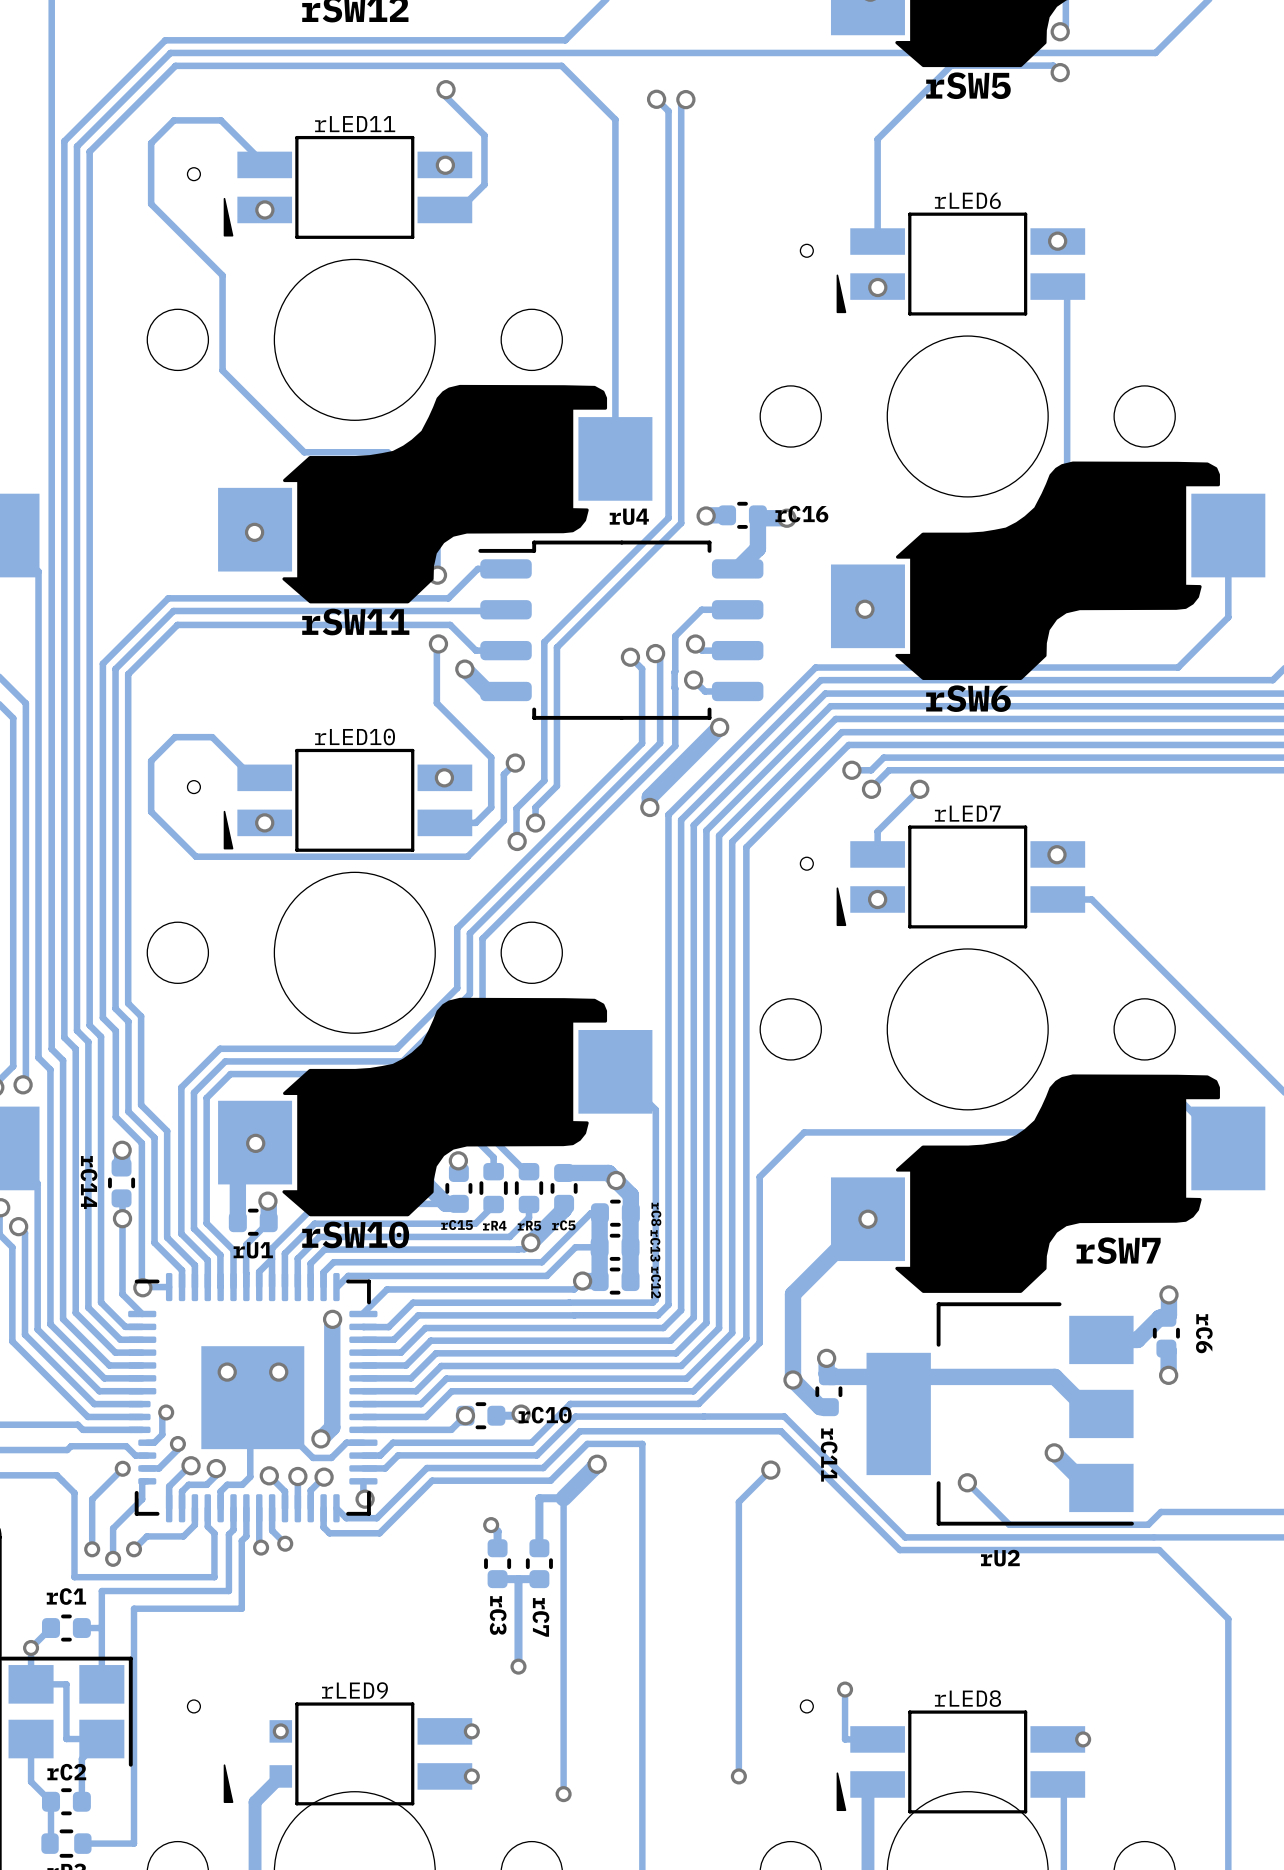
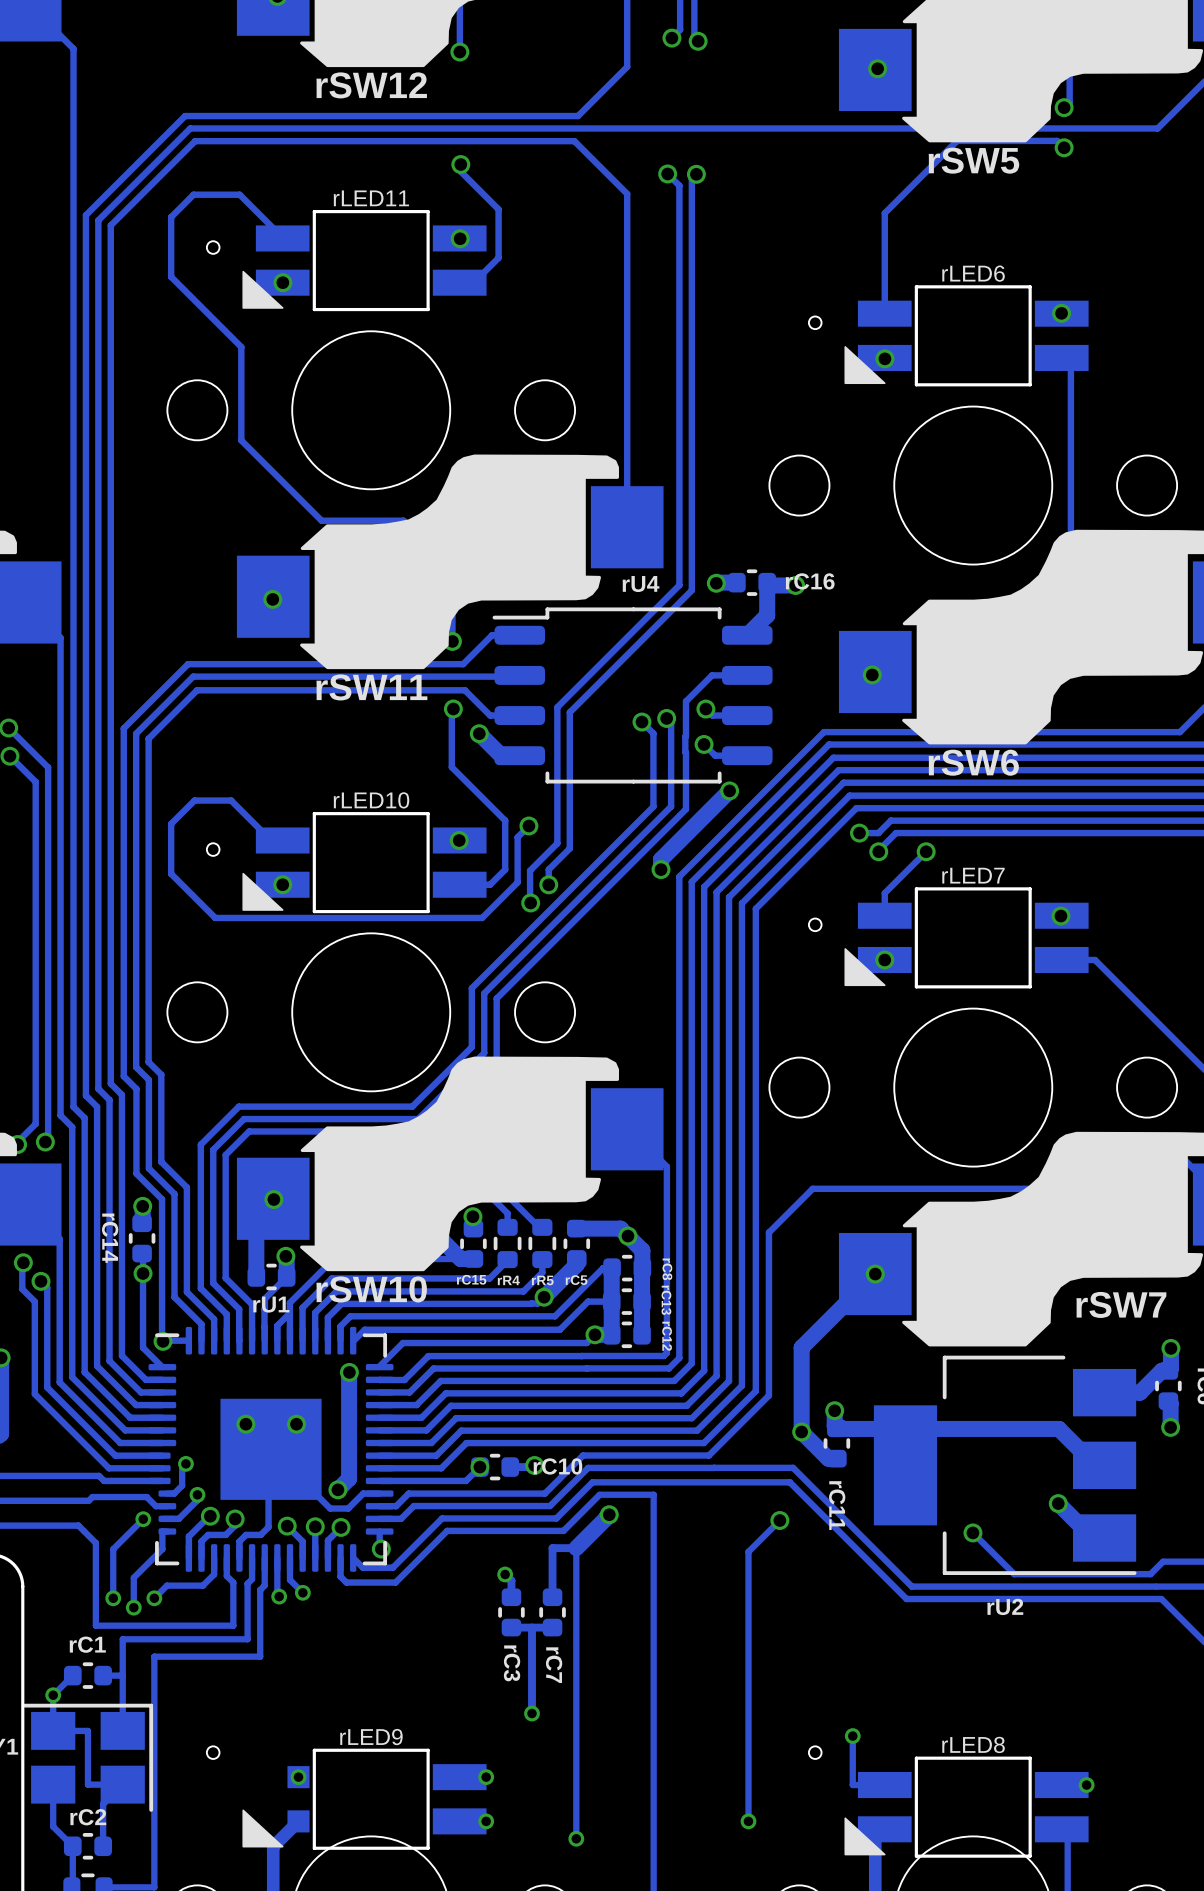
rLED11 footprint: [223, 135, 473, 239] -> [242, 210, 487, 312]
rLED6 footprint: [836, 212, 1086, 316] -> [844, 285, 1089, 387]
rLED10 footprint: [223, 748, 473, 852] -> [242, 812, 487, 914]
rLED7 footprint: [836, 825, 1086, 929] -> [844, 887, 1089, 989]
rLED9 footprint: [223, 1702, 473, 1806] -> [242, 1748, 487, 1850]
rLED8 footprint: [836, 1710, 1086, 1814] -> [844, 1756, 1089, 1858]

